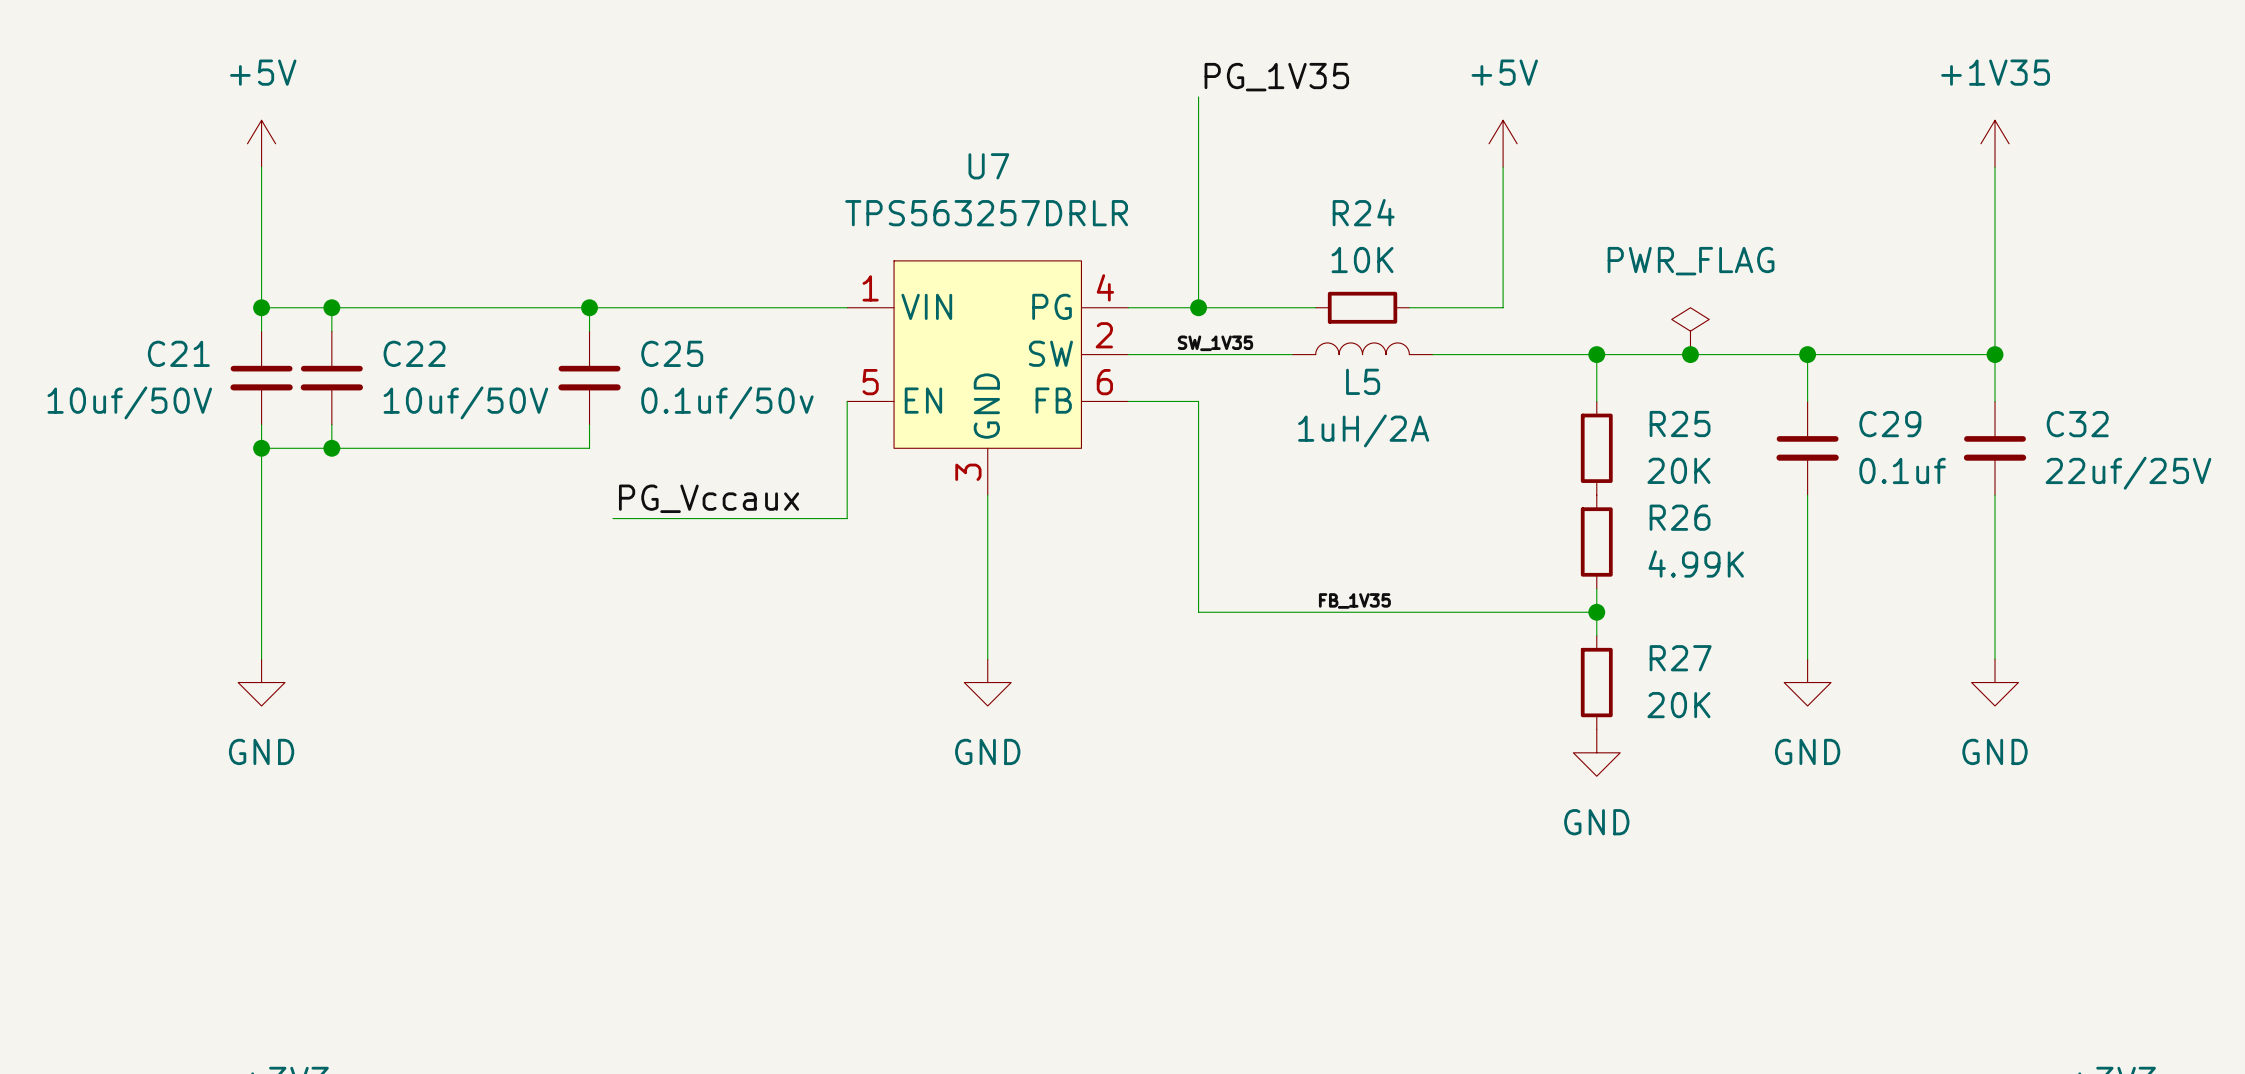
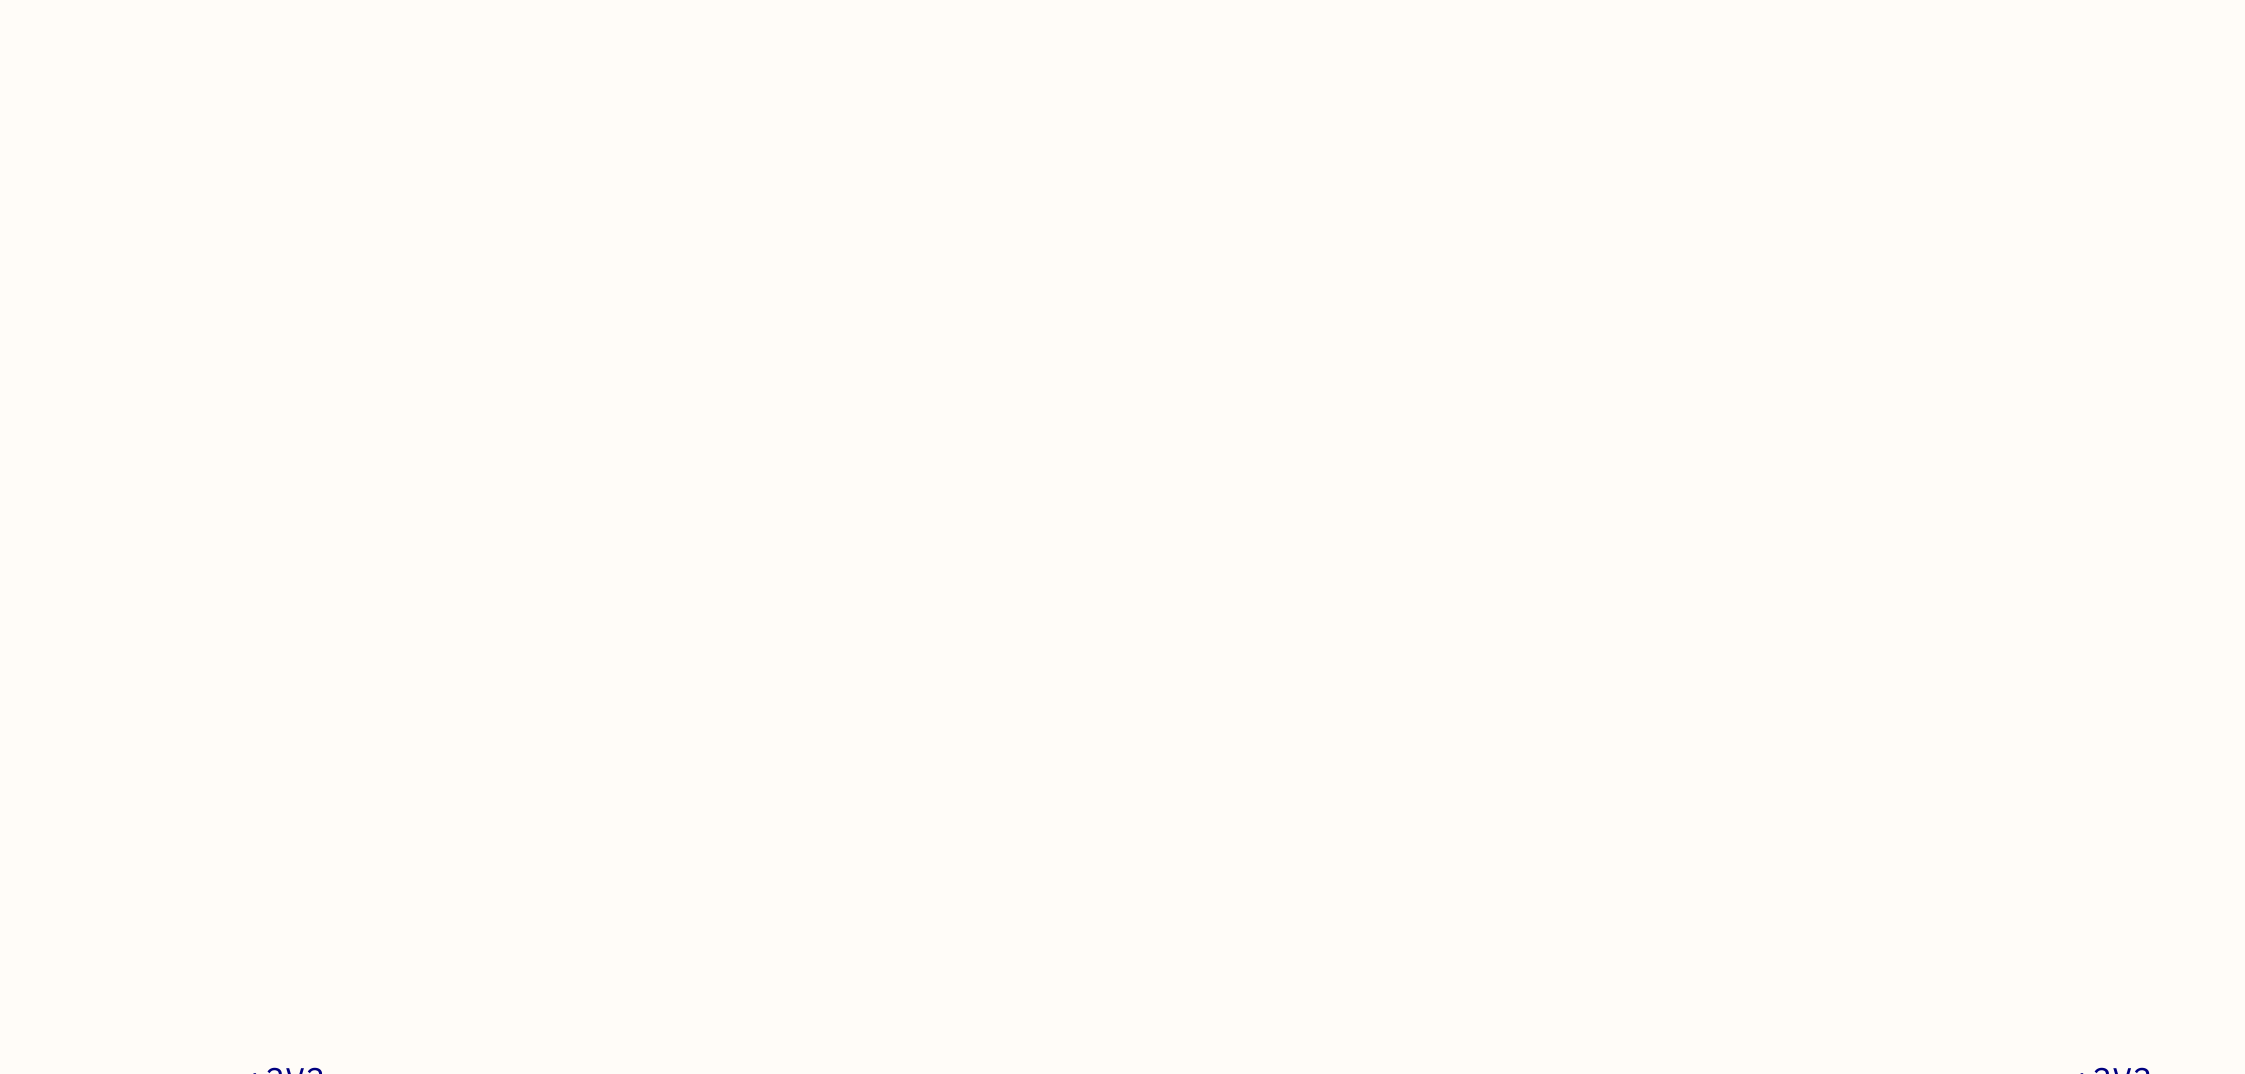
label: PG_1V35 (1276, 77) -> none
wire: (1198, 96) (1198, 307) -> none
power symbol: +5V (261, 143) -> none
power symbol: +5V (1503, 143) -> none
power symbol: +1V35 (1995, 143) -> none
wire: (261, 167) (261, 331) -> none
wire: (1503, 167) (1503, 307) (1409, 307) -> none
wire: (1995, 167) (1995, 401) -> none
wire: (261, 307) (847, 307) -> none
junction: (261, 307) -> none
wire: (331, 307) (331, 331) -> none
junction: (331, 307) -> none
wire: (589, 307) (589, 331) -> none
junction: (589, 307) -> none
wire: (1128, 307) (1315, 307) -> none
junction: (1198, 307) -> none
R24: 10K (1362, 307) -> none
power symbol: PWR_FLAG (1690, 331) -> none
label: SW_1V35 (1215, 343) -> none
L5: 1uH/2A (1362, 348) -> none
wire: (1128, 354) (1292, 354) -> none
wire: (1432, 354) (1995, 354) -> none
wire: (1596, 354) (1596, 401) -> none
junction: (1596, 354) -> none
junction: (1690, 354) -> none
wire: (1807, 354) (1807, 401) -> none
junction: (1807, 354) -> none
junction: (1995, 354) -> none
C21: 10uf/50V (261, 378) -> none
C22: 10uf/50V (331, 378) -> none
C25: 0.1uf/50v (589, 378) -> none
U7: TPS563257DRLR (987, 378) -> none
wire: (847, 401) (847, 518) (612, 518) -> none
wire: (1128, 401) (1198, 401) (1198, 612) (1596, 612) -> none
wire: (261, 424) (261, 659) -> none
wire: (331, 424) (331, 448) -> none
wire: (589, 424) (589, 448) (261, 448) -> none
junction: (261, 448) -> none
junction: (331, 448) -> none
R25: 20K (1596, 448) -> none
C29: 0.1uf (1807, 448) -> none
C32: 22uf/25V (1995, 448) -> none
wire: (987, 495) (987, 659) -> none
wire: (1807, 495) (1807, 659) -> none
wire: (1995, 495) (1995, 659) -> none
label: PG_Vccaux (709, 498) -> none
R26: 4.99K (1596, 541) -> none
wire: (1596, 588) (1596, 635) -> none
label: FB_1V35 (1354, 600) -> none
junction: (1596, 612) -> none
power symbol: GND (261, 682) -> none
power symbol: GND (987, 682) -> none
R27: 20K (1596, 682) -> none
power symbol: GND (1807, 682) -> none
power symbol: GND (1995, 682) -> none
power symbol: GND (1596, 752) -> none

